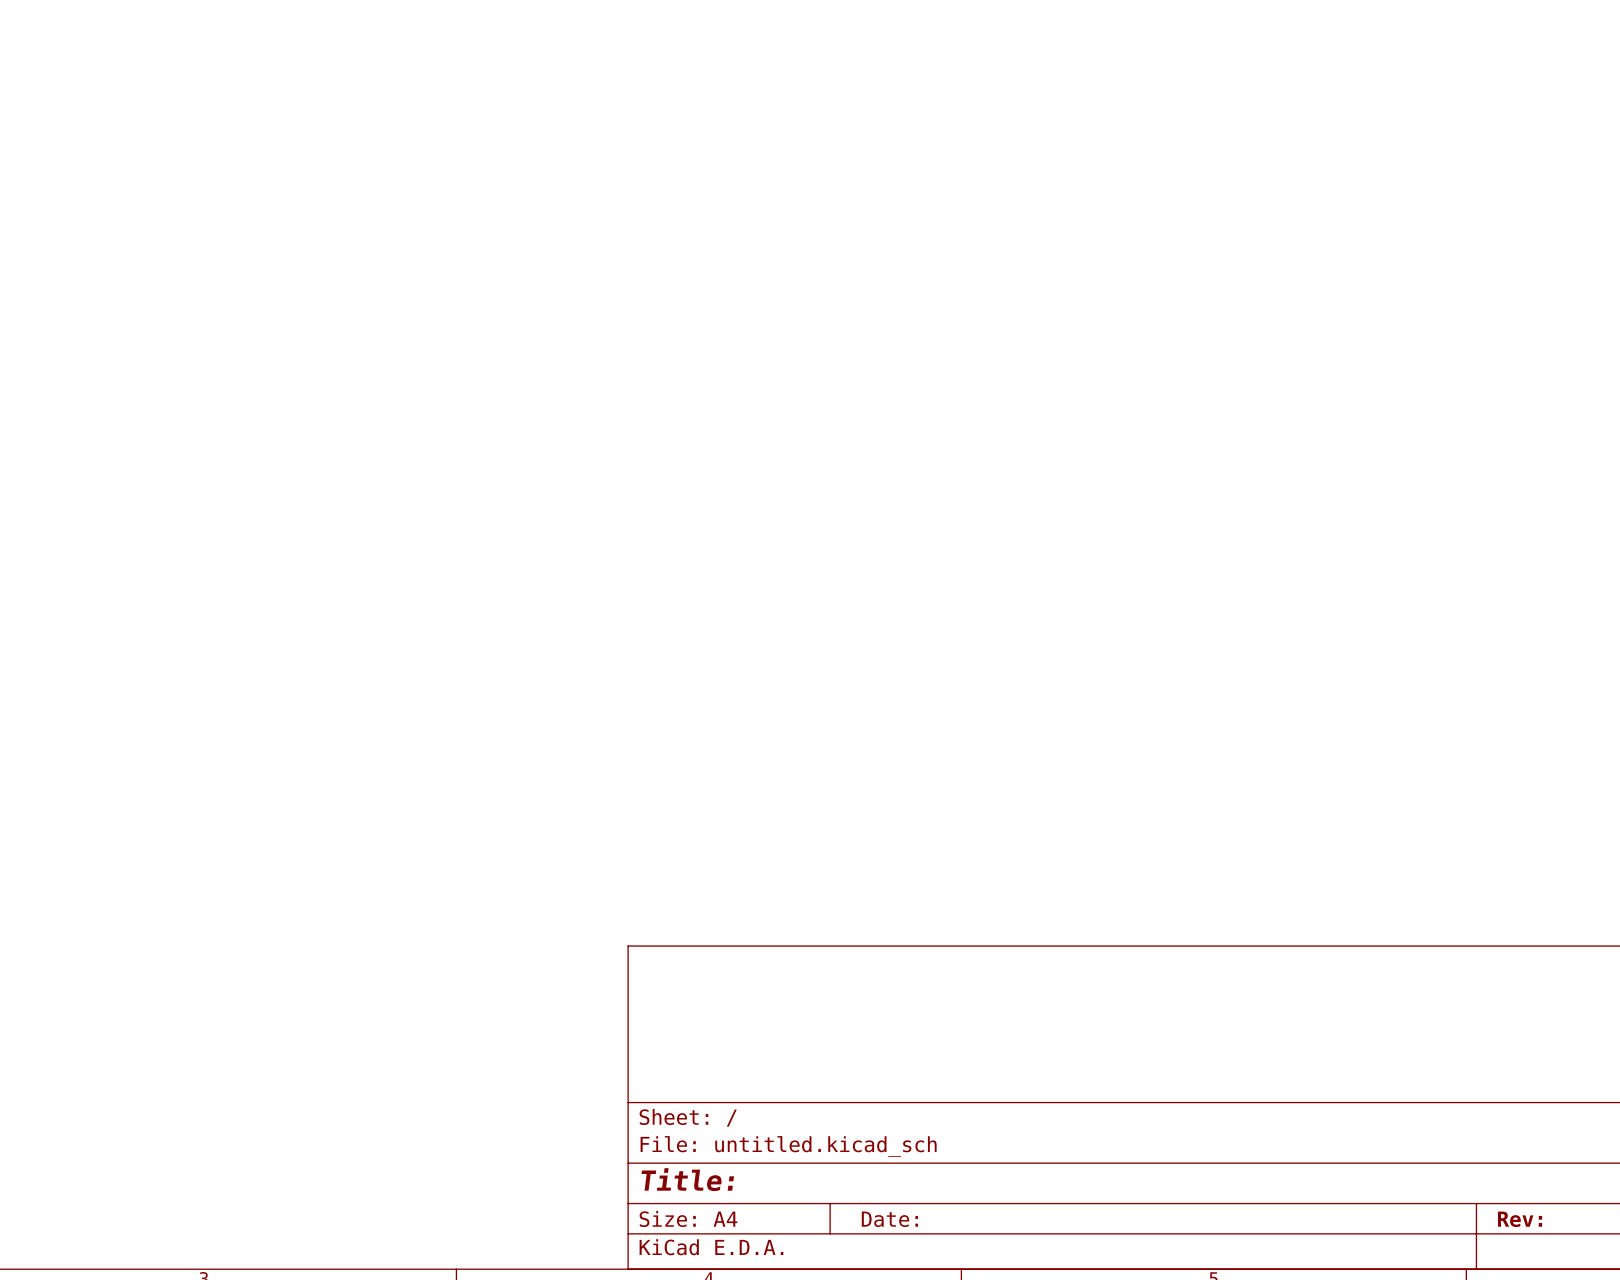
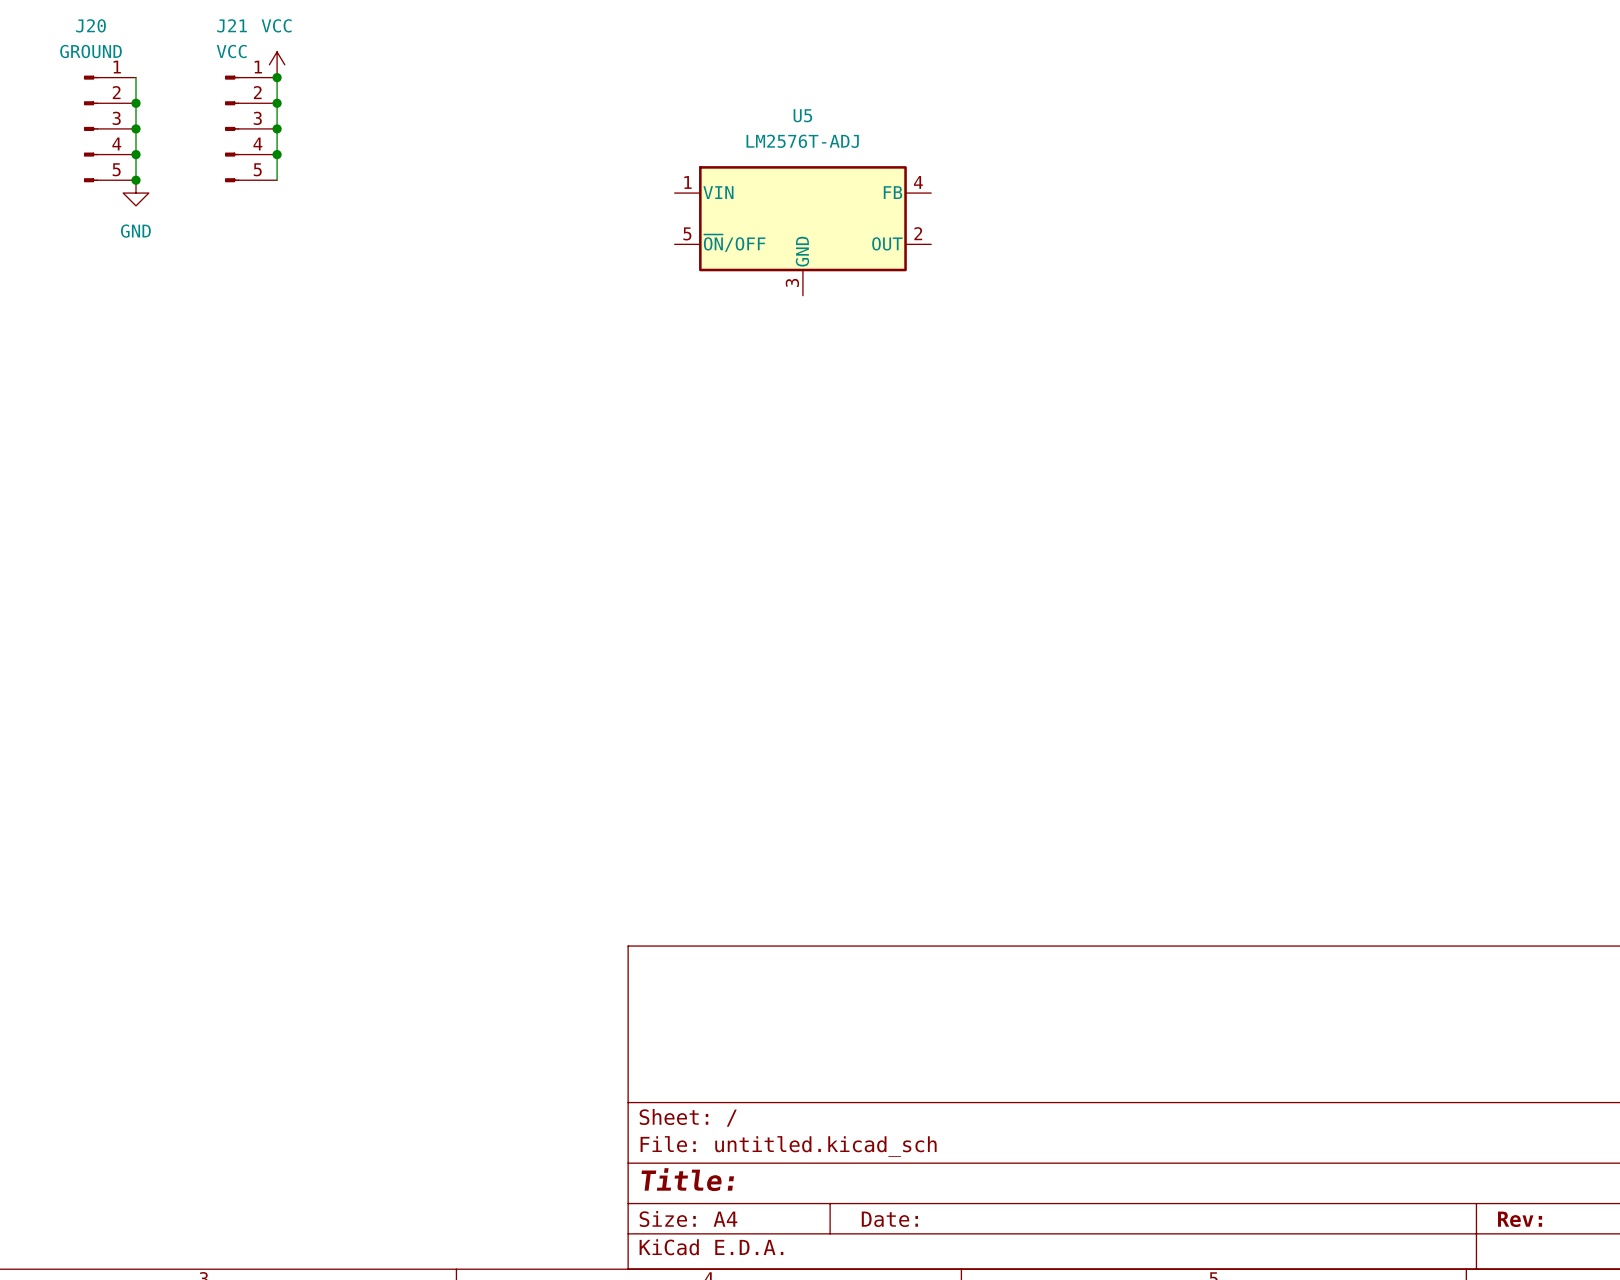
power symbol: none -> VCC (277, 64)
wire: none -> (136, 77) (136, 180)
wire: none -> (277, 77) (277, 180)
junction: none -> (277, 77)
junction: none -> (136, 103)
junction: none -> (277, 103)
J20: none -> GROUND (109, 128)
junction: none -> (136, 128)
J21: none -> VCC (251, 128)
junction: none -> (277, 128)
junction: none -> (136, 154)
junction: none -> (277, 154)
junction: none -> (136, 180)
power symbol: none -> GND (136, 193)
U5: none -> LM2576T-ADJ (802, 230)

